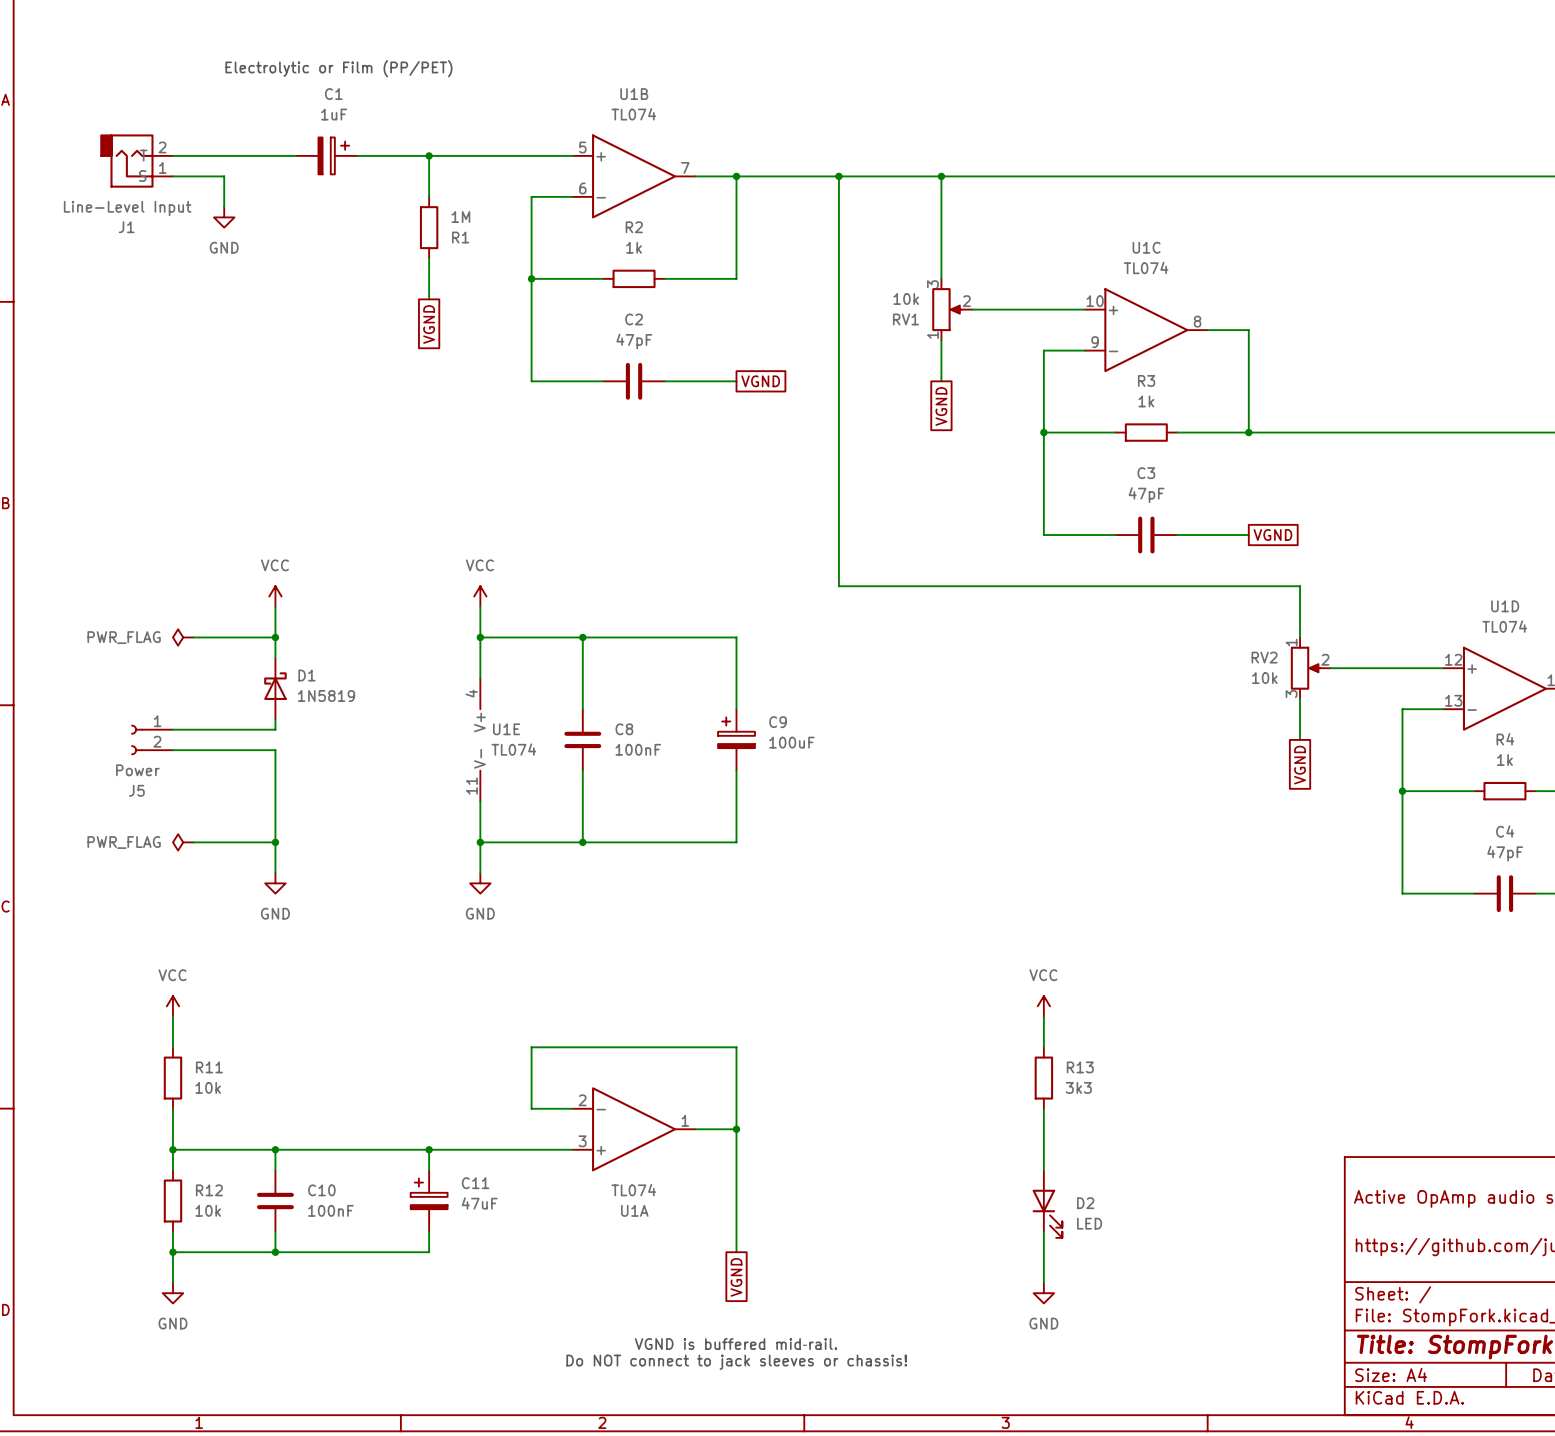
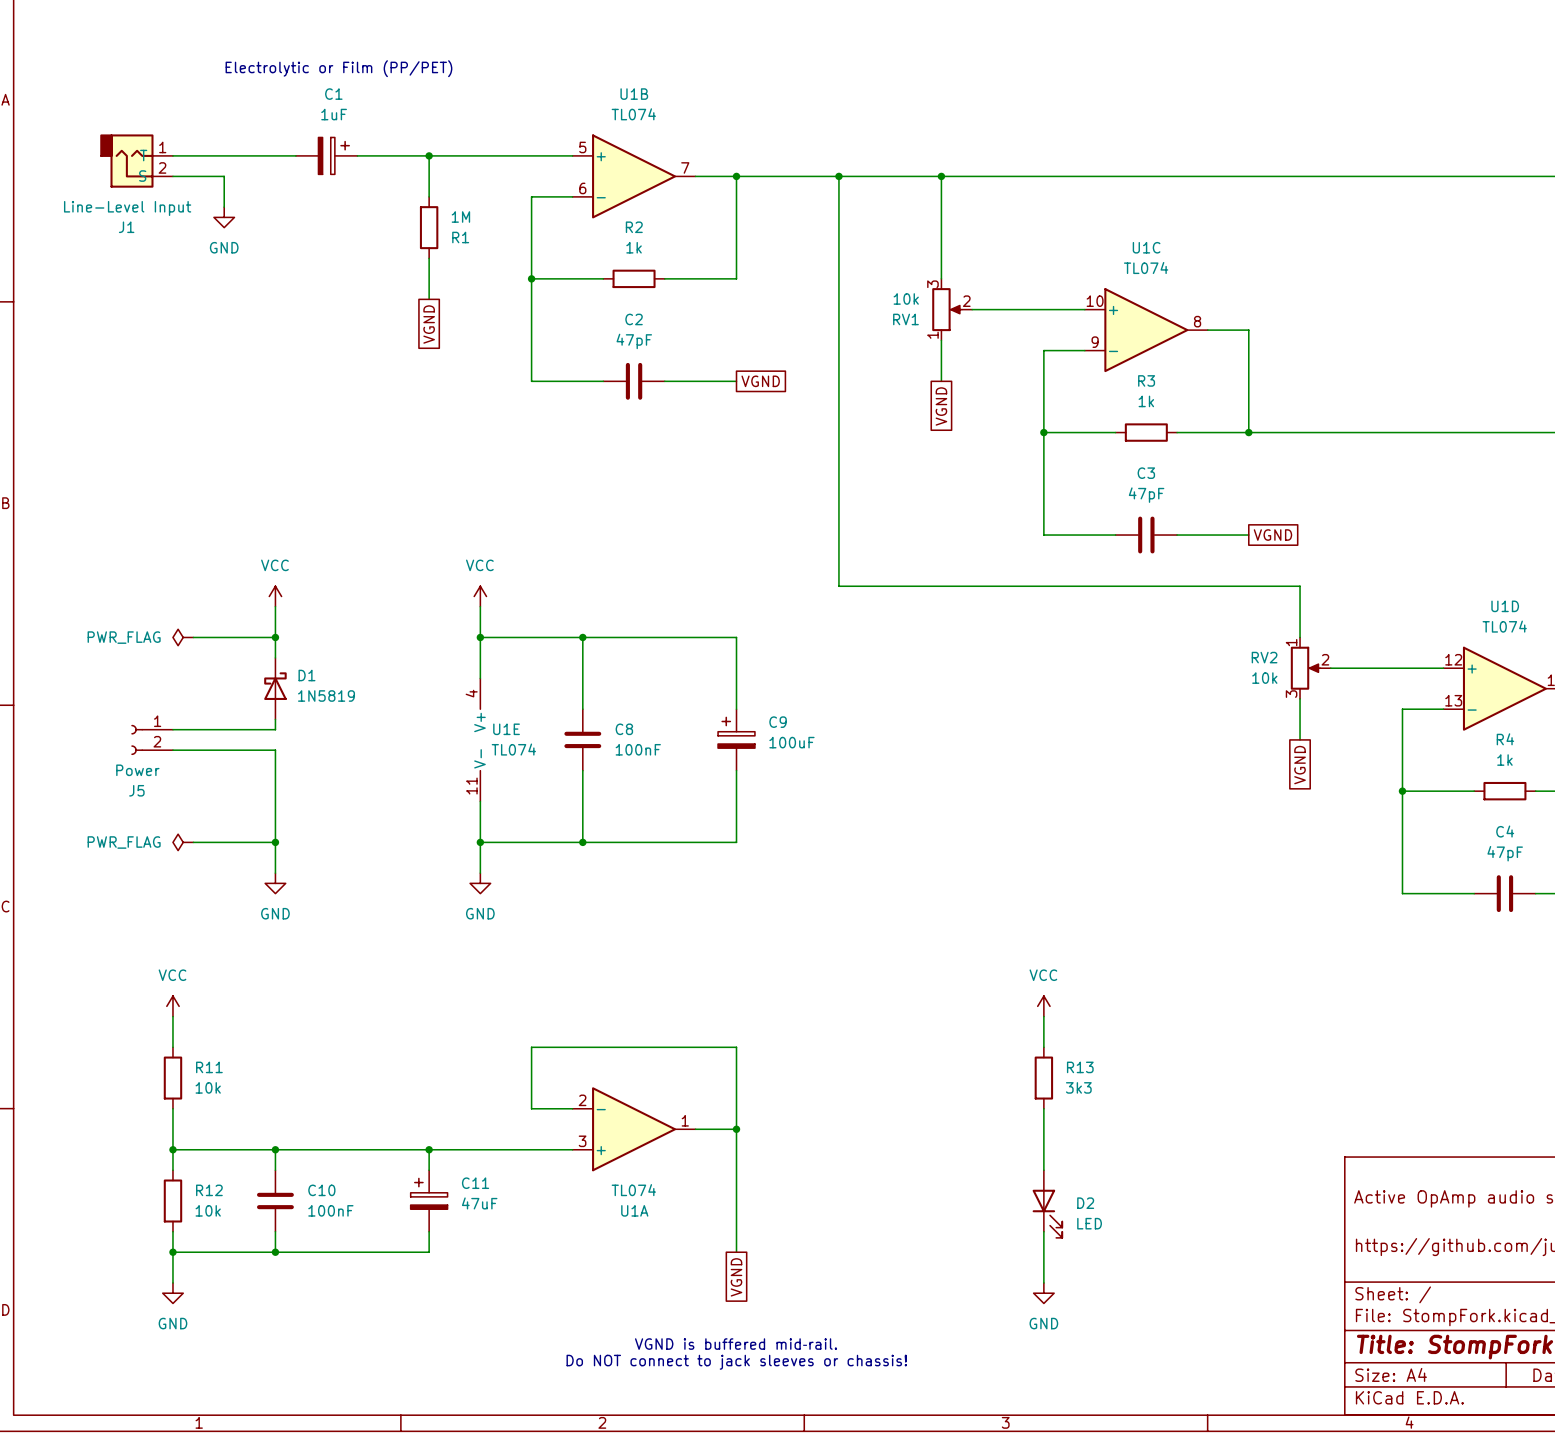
J1 pin number: 2 (162, 147) -> 1 (162, 147)
J1 pin number: 1 (162, 167) -> 2 (162, 167)

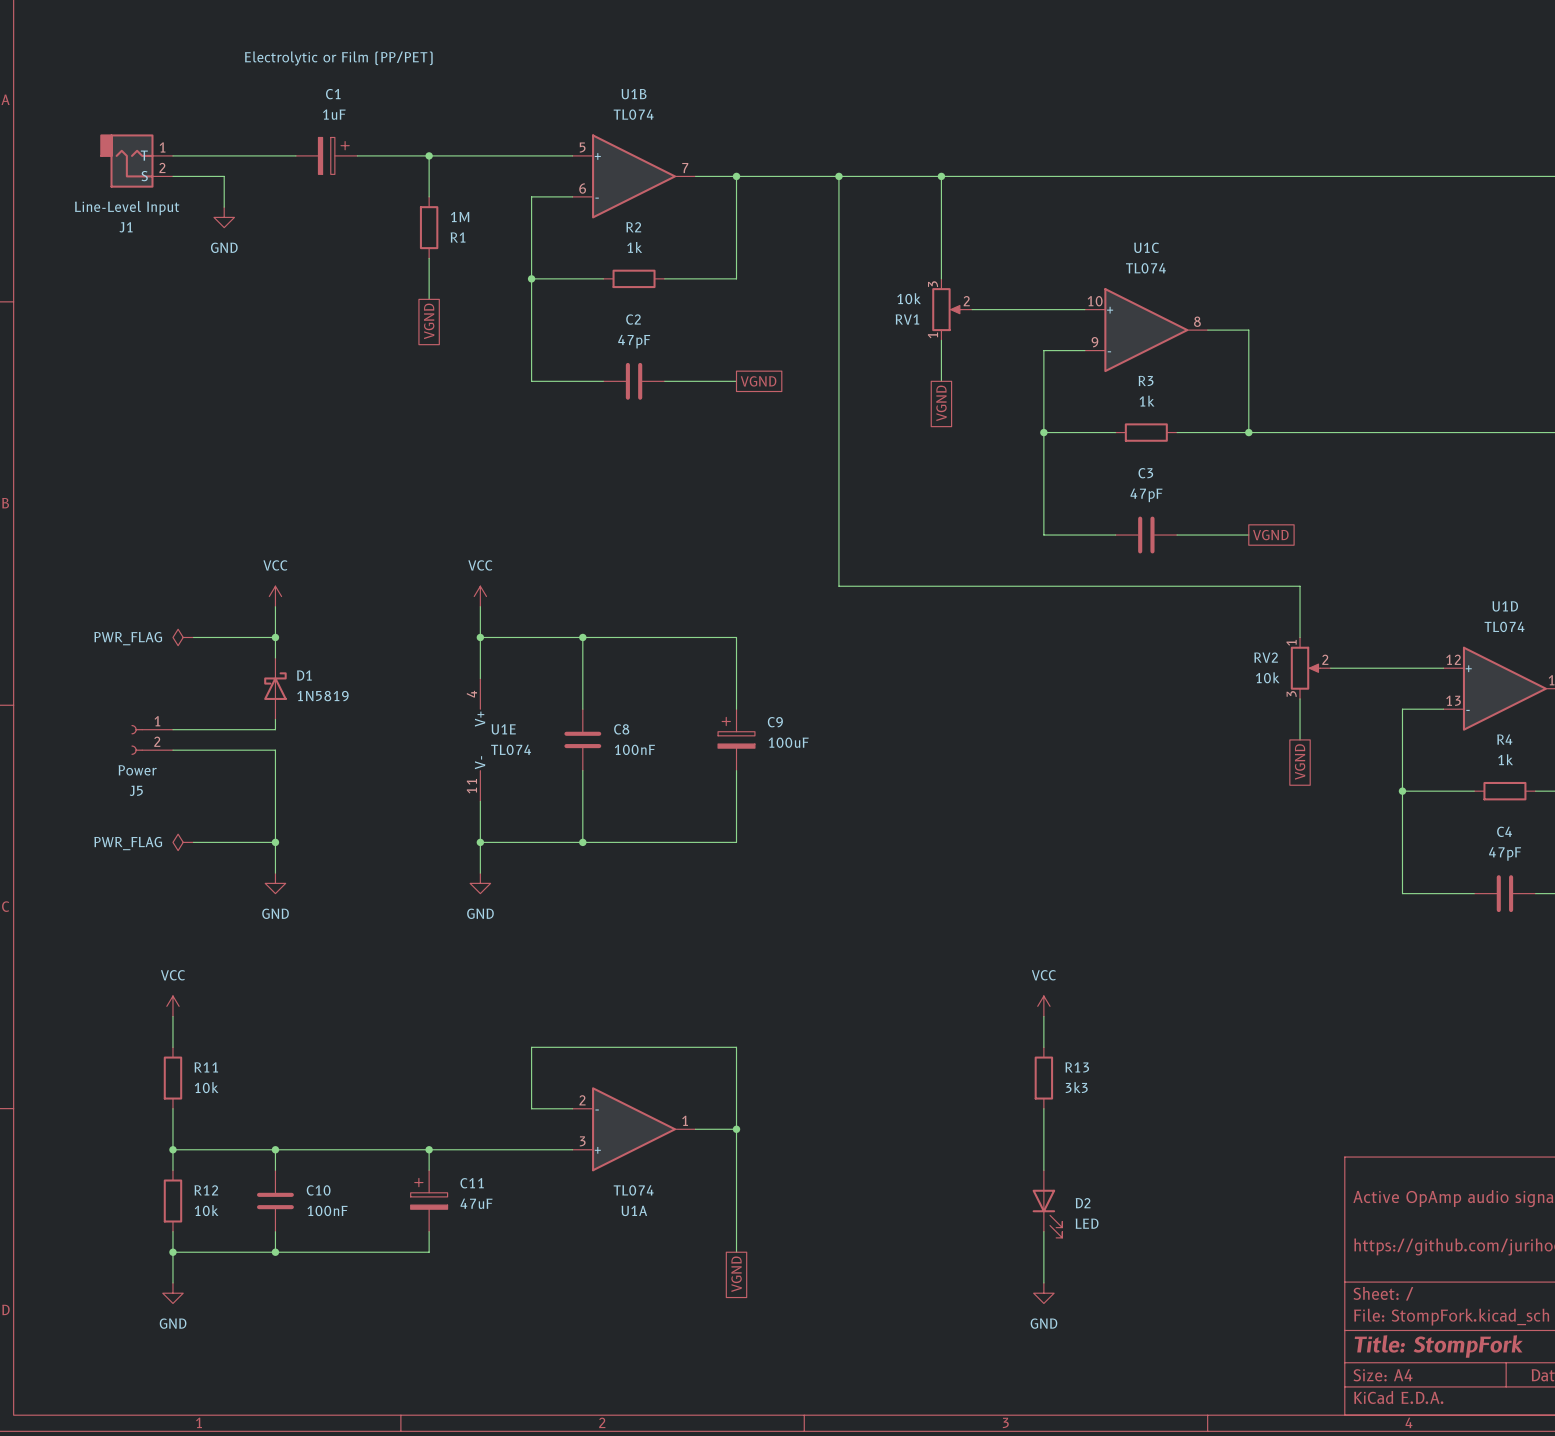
C1 text: none -> Electrolytic or Film (PP/PET) (338, 58)
text: Electrolytic or Film (PP/PET) (338, 68) -> none
text: VGND is buffered mid‑rail. (736, 1344) -> none
text: Do NOT connect to jack sleeves or chassis! (736, 1362) -> none

